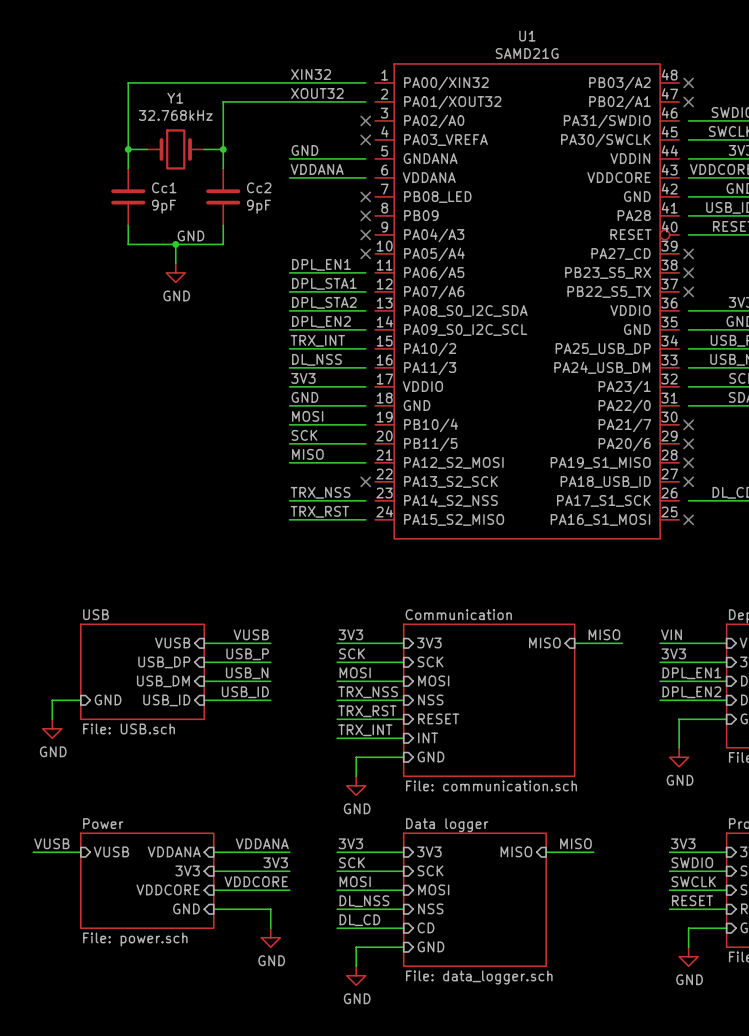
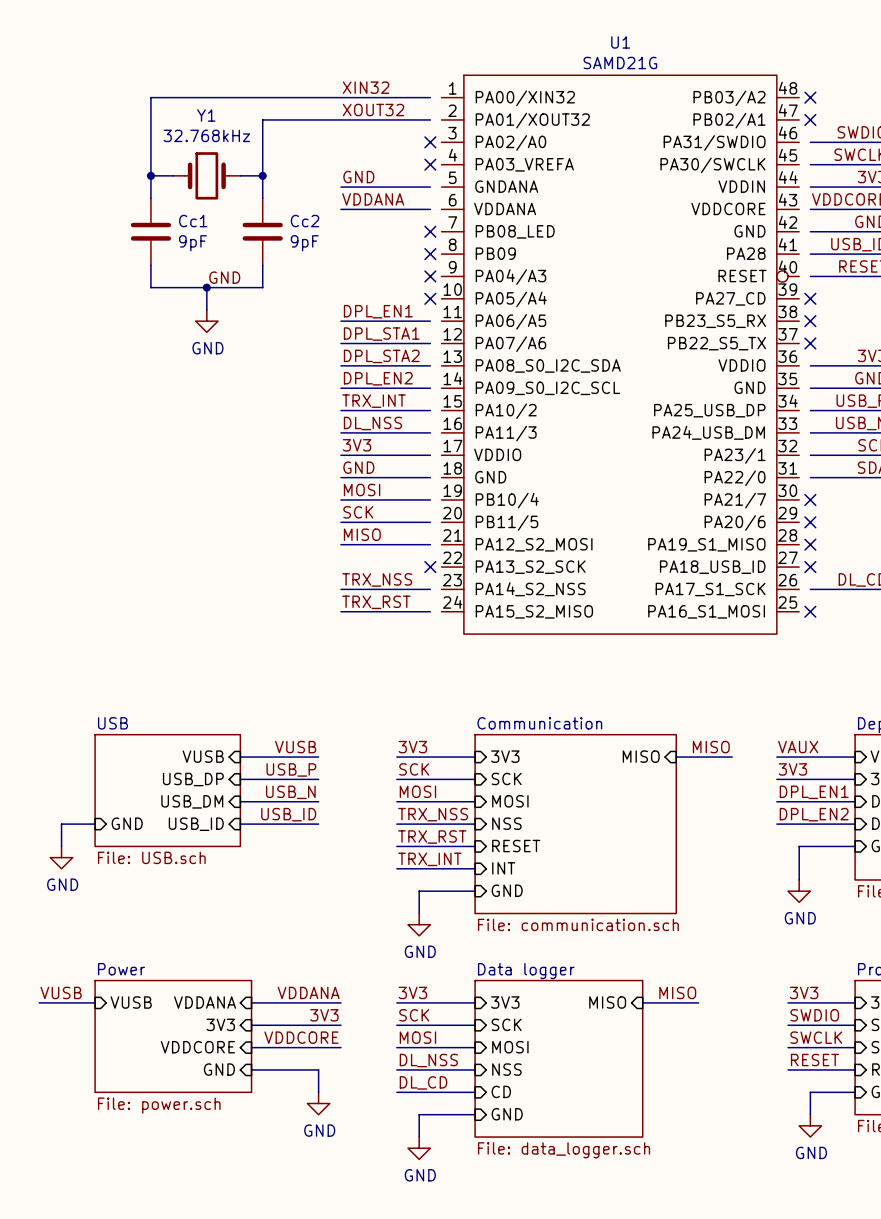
label: VIN (671, 634) -> VAUX (798, 747)

